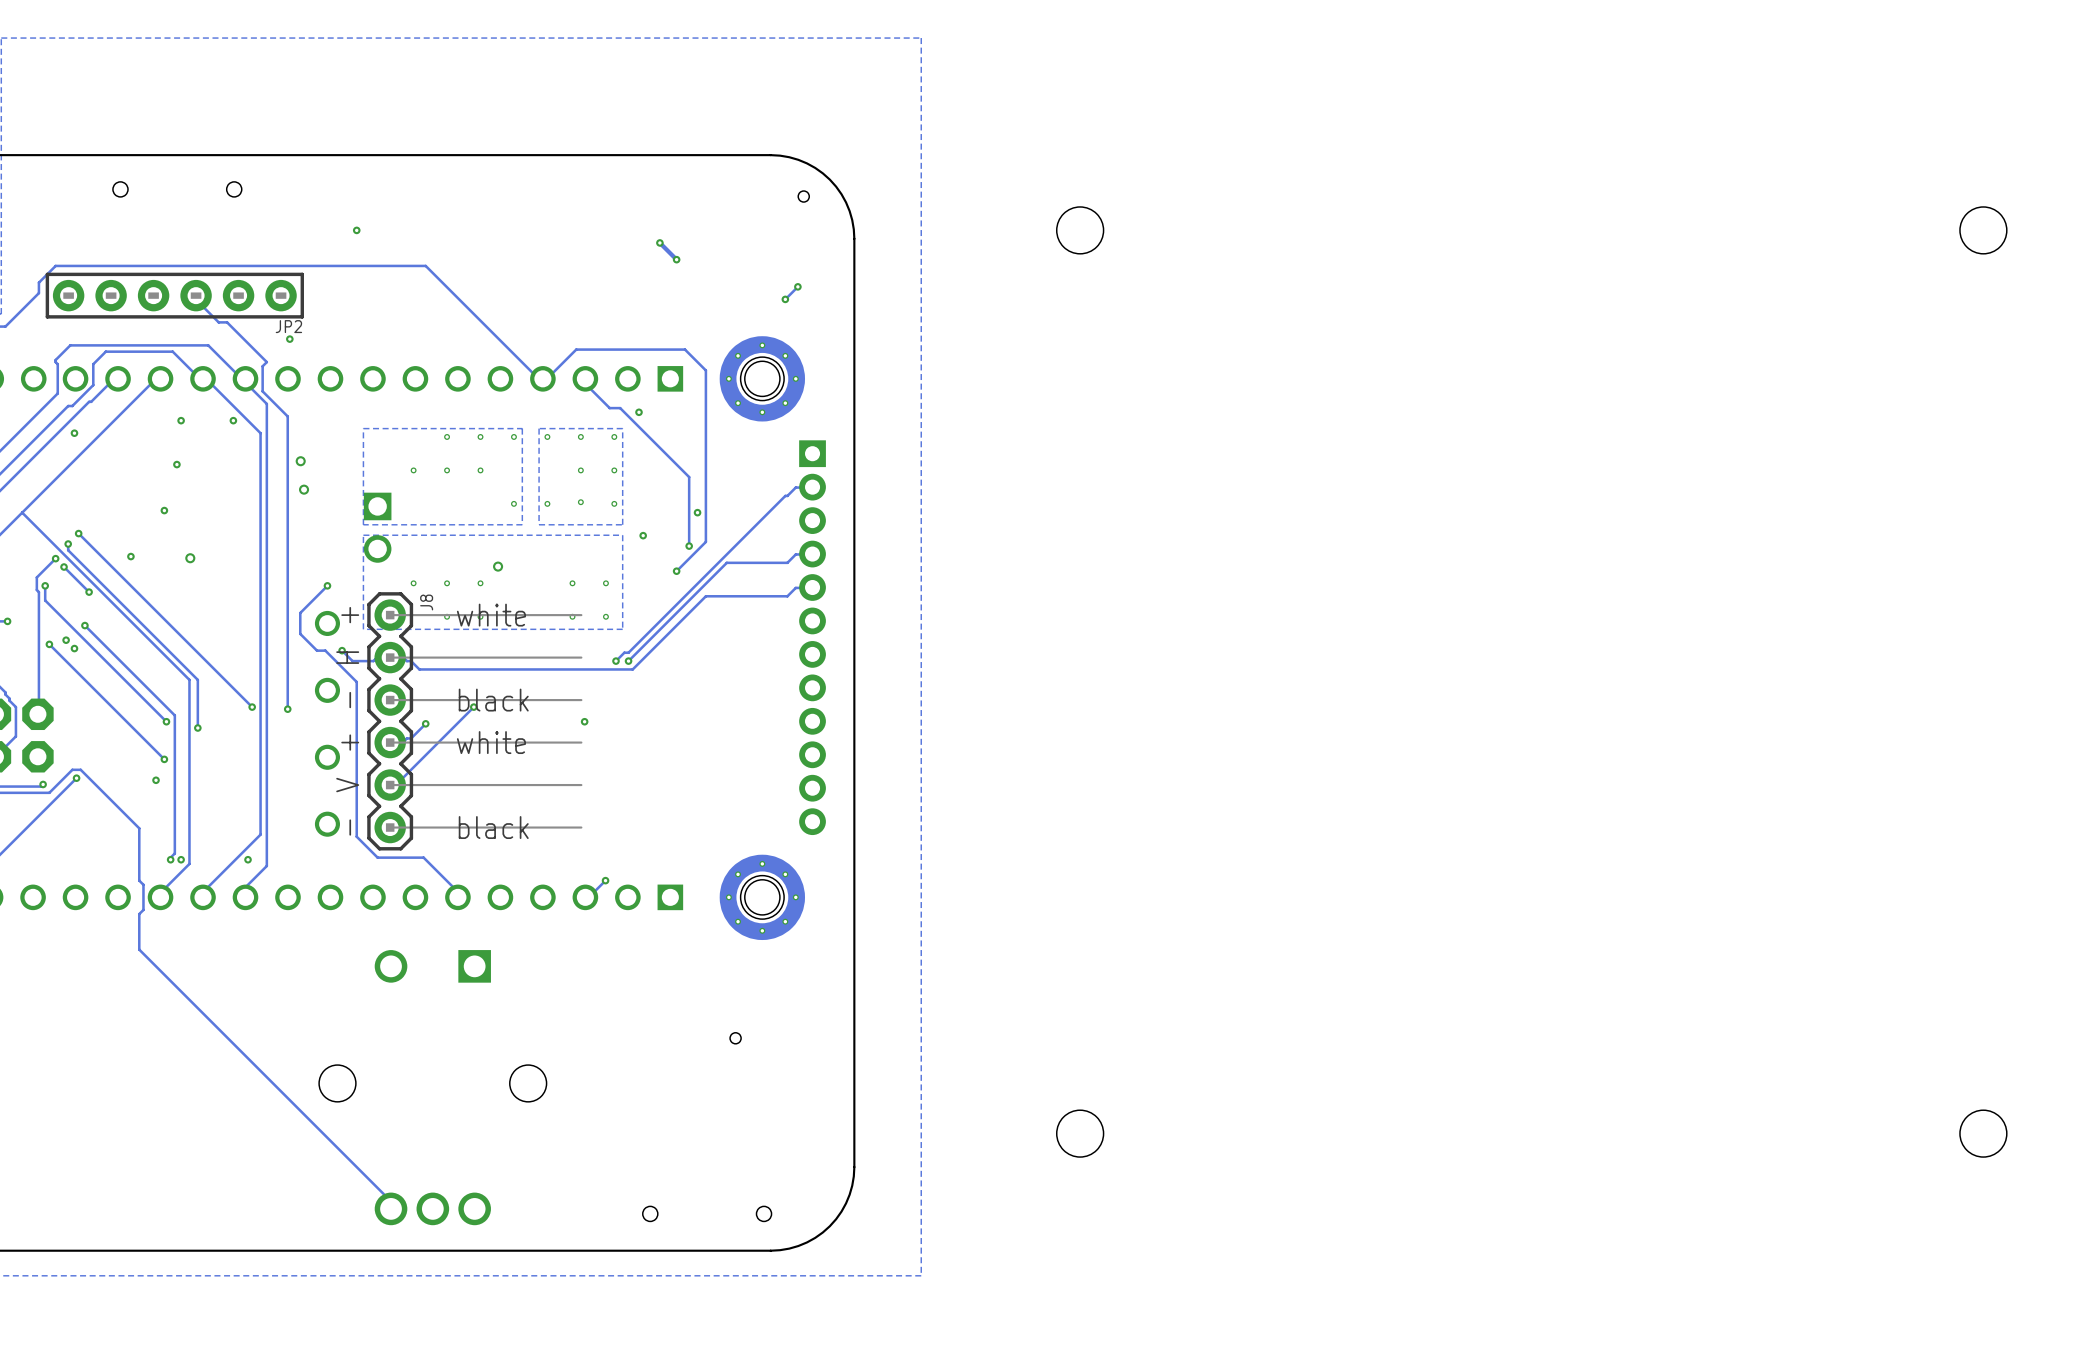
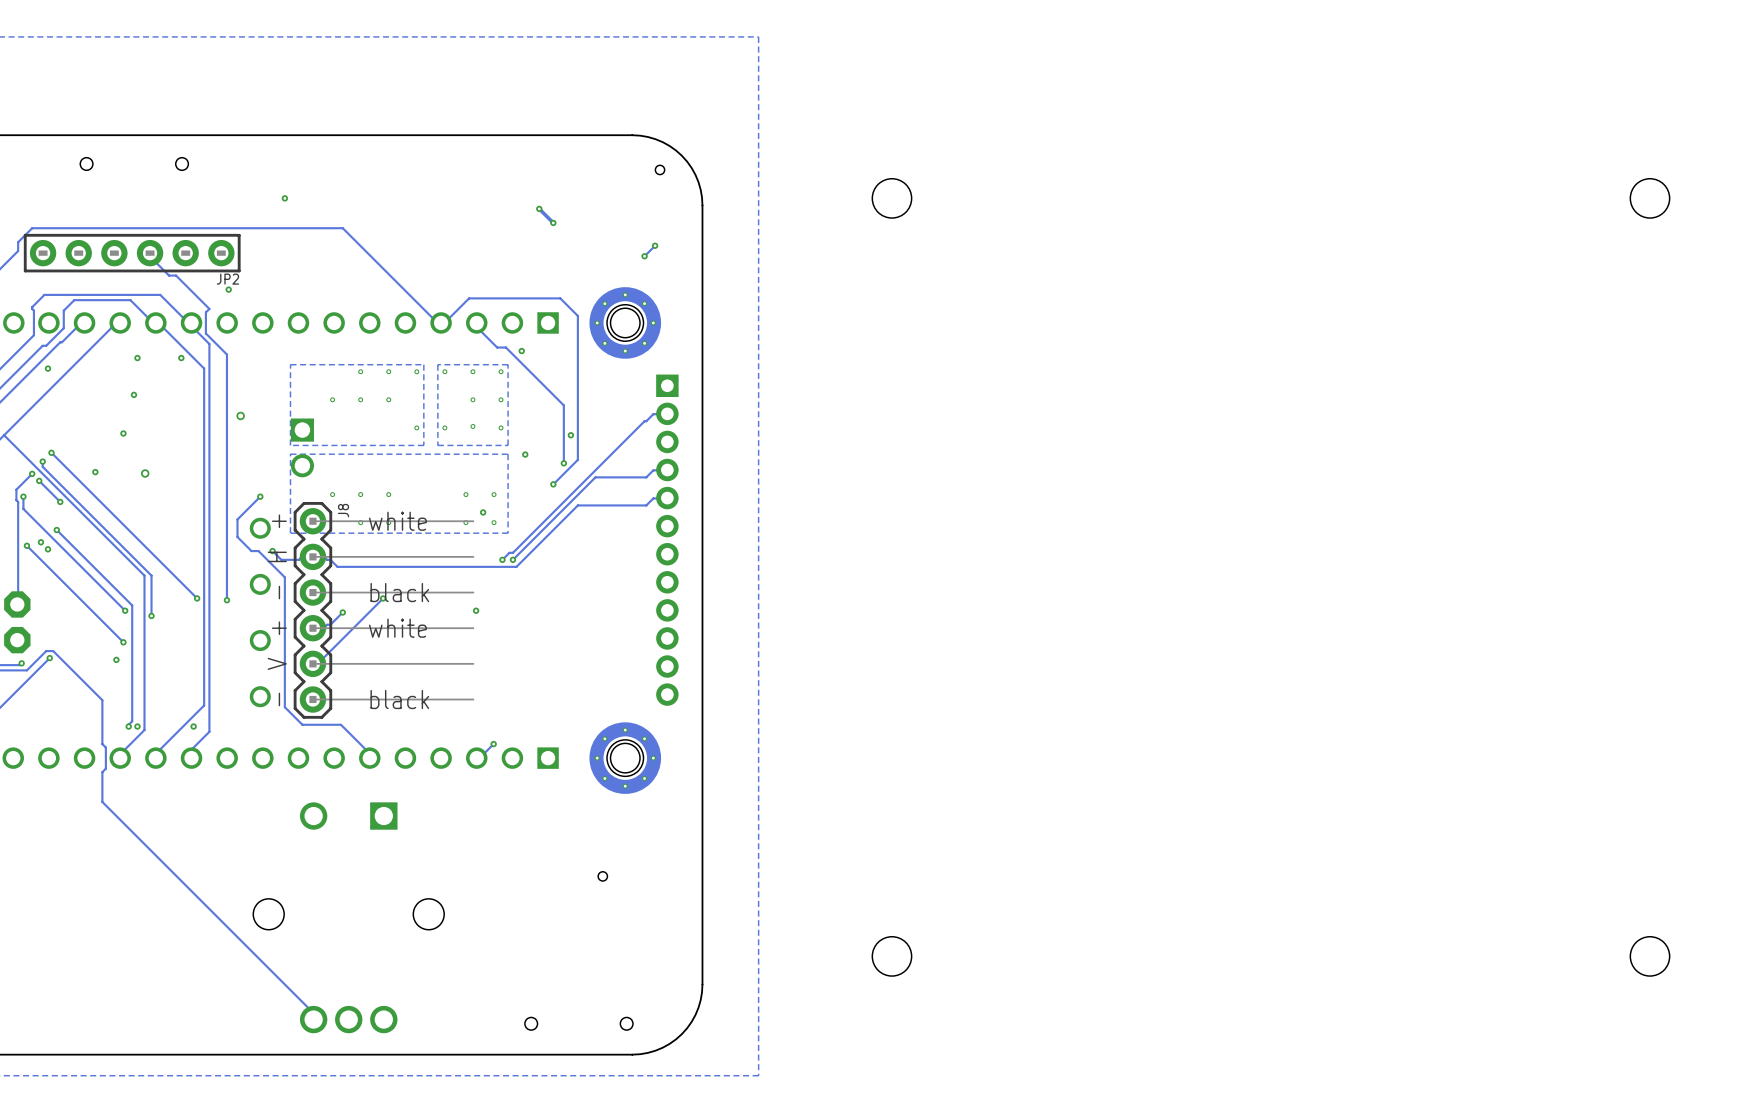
via: (300, 461) -> none
via: (498, 566) -> none
via: none -> (483, 512)

